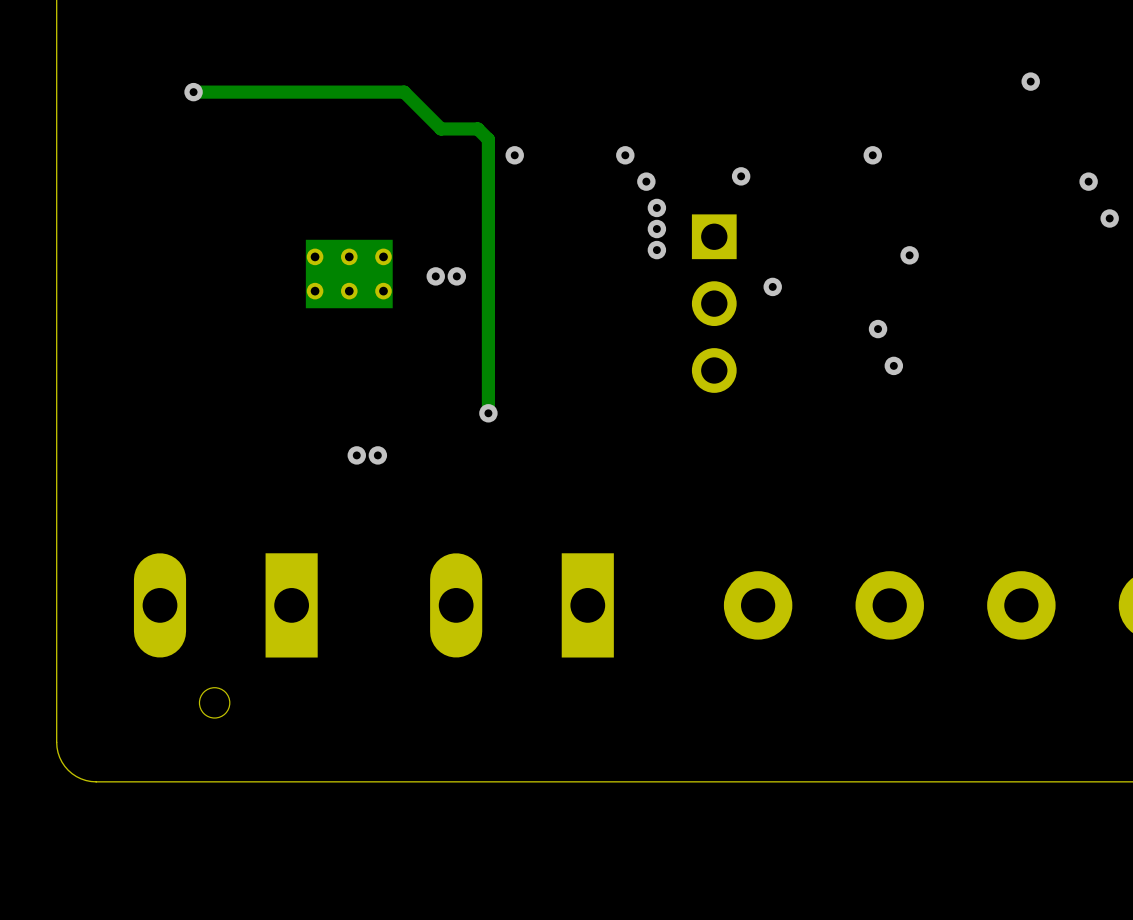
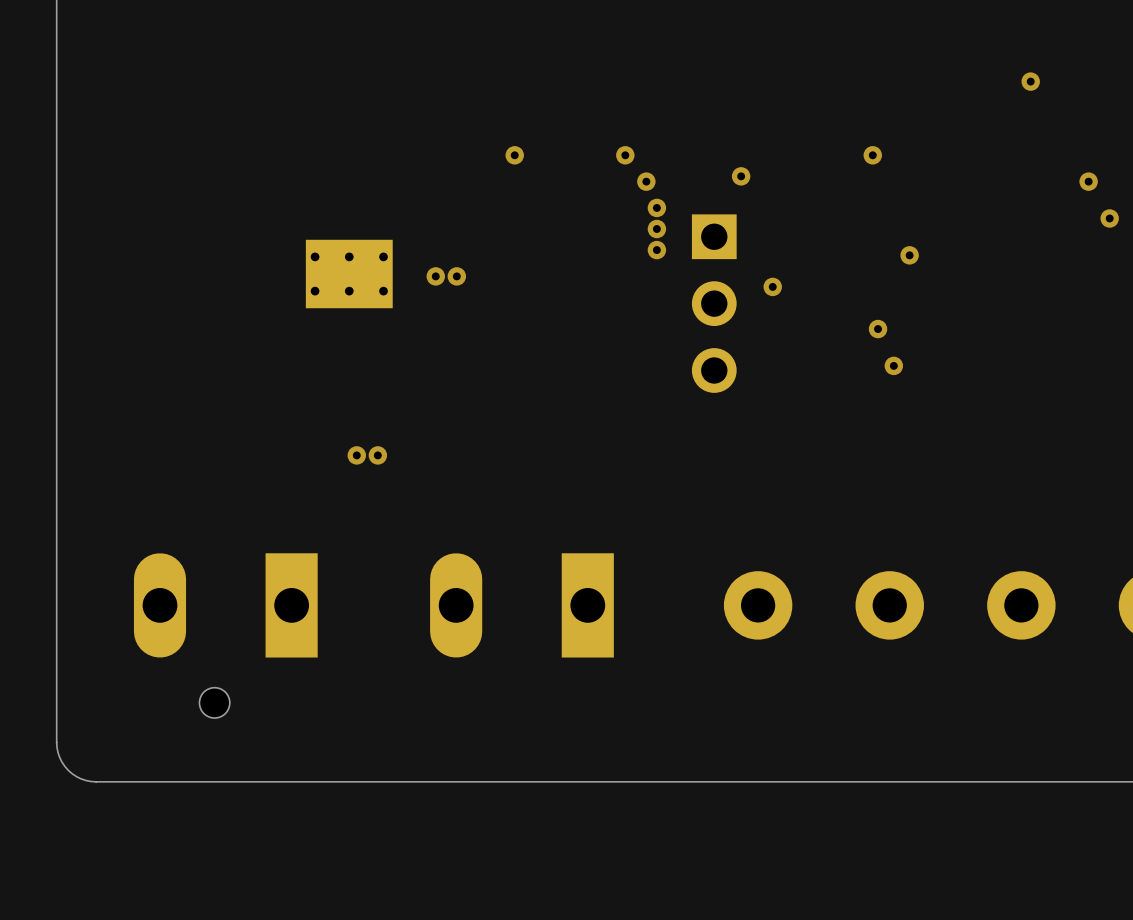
track: (193, 92) (404, 92) (441, 128) (477, 128) (488, 139) (488, 413) -> none
via: (193, 92) -> none
via: (488, 413) -> none

